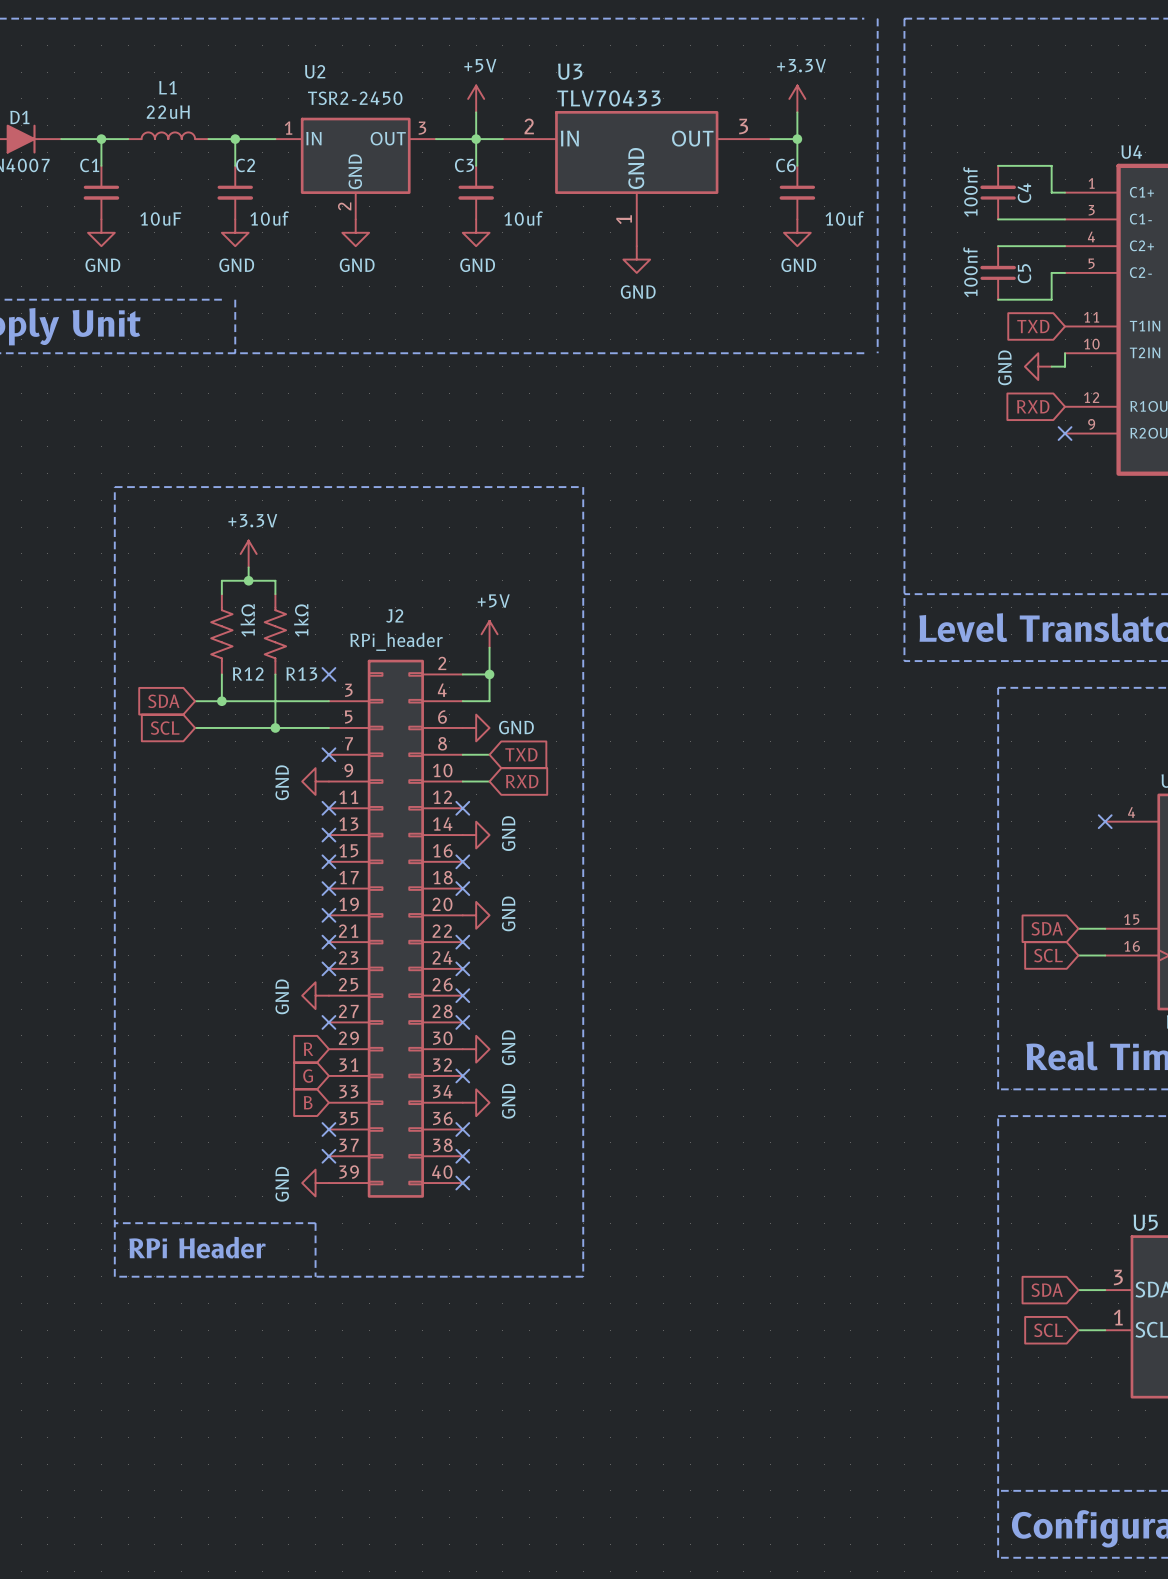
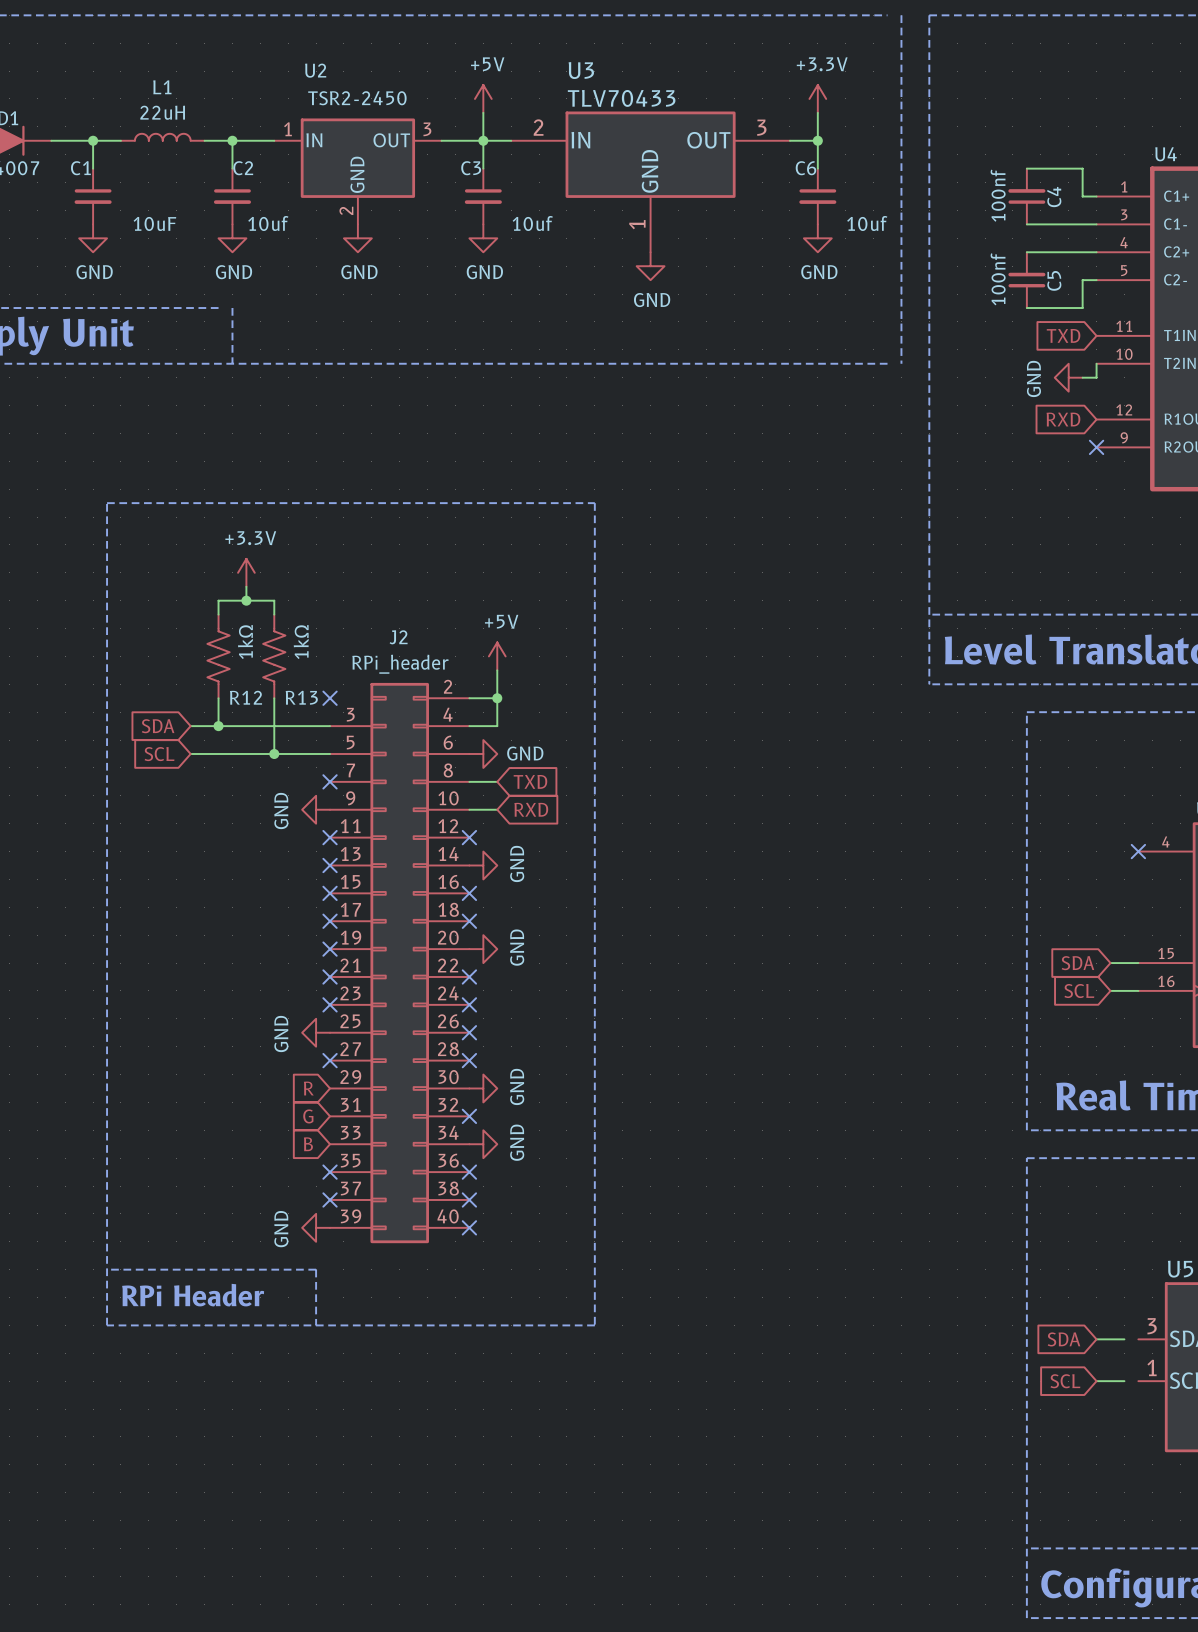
global label position: SDA (1047, 1290) -> SDA (1064, 1339)
wire: (1091, 1290) (1105, 1290) -> (1096, 1339) (1110, 1339)
global label position: SCL (1048, 1330) -> SCL (1065, 1381)
wire: (1091, 1330) (1105, 1330) -> (1096, 1381) (1110, 1381)

